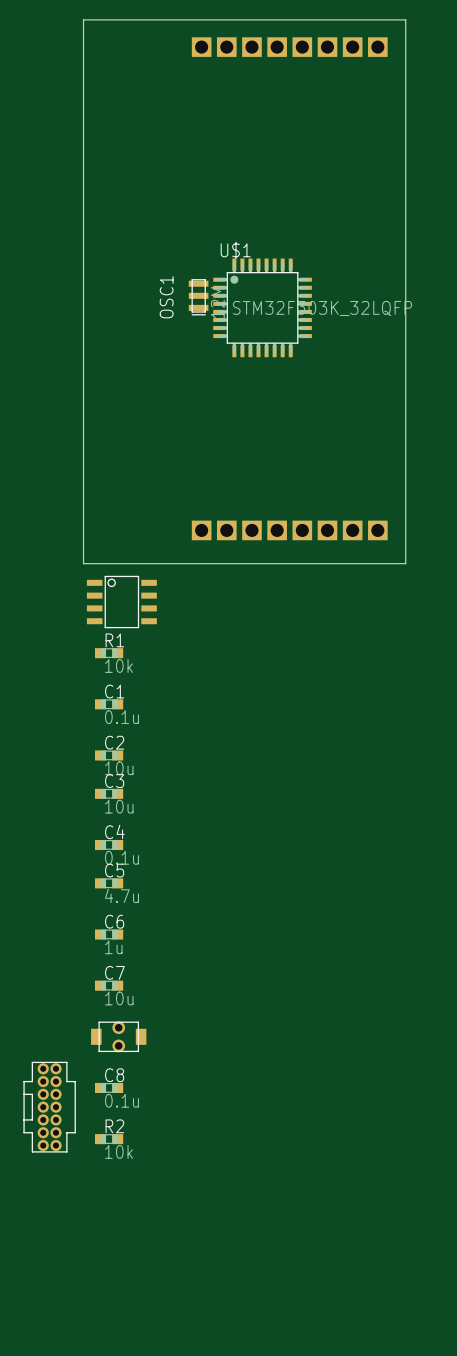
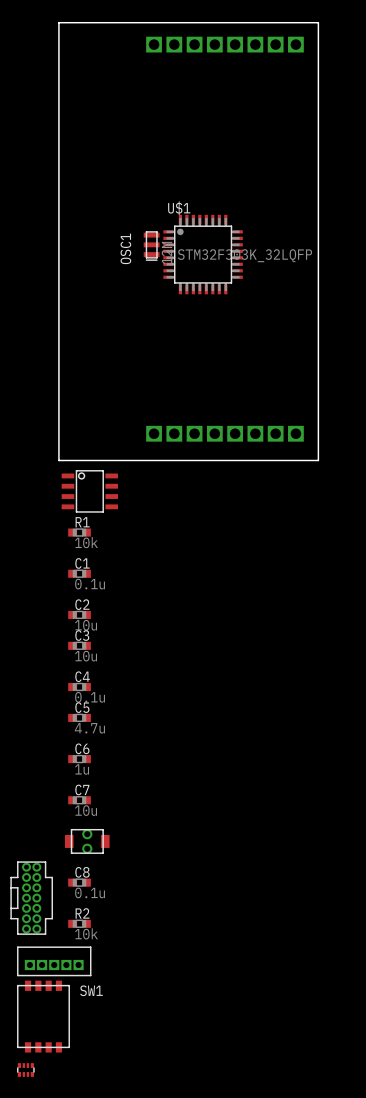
part: none -> (54, 961)
SW1: none -> (43, 1016)
part: none -> (25, 1070)

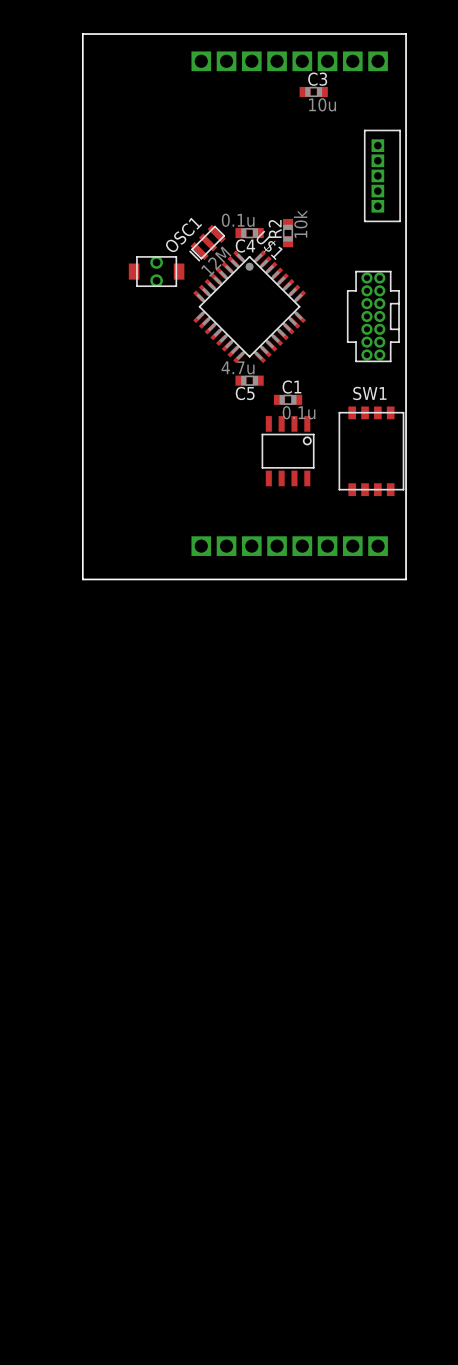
part: none -> (382, 175)
part: none -> (156, 271)
OSC1 rotation: 0° (151, 246) -> 45° clockwise (207, 243)
OSC1 position: (151, 246) -> (207, 243)
part: none -> (373, 316)
U$1 rotation: 0° (203, 254) -> 45° clockwise (249, 306)
U$1 value: STM32F303K_32LQFP (244, 255) -> none
part rotation: 0° (89, 491) -> 90° clockwise (288, 451)
part position: (89, 491) -> (288, 451)
R1: 10k (79, 532) -> none
C1 position: (79, 573) -> (288, 399)
C2: 10u (79, 614) -> none
C3 position: (79, 645) -> (313, 91)
C4 name position: C4 (82, 676) -> C4 (245, 245)
C4 position: (79, 687) -> (249, 233)
C4 value position: 0.1u (90, 697) -> 0.1u (238, 220)
C5 name position: C5 (82, 707) -> C5 (245, 393)
C5 position: (79, 717) -> (249, 380)
C5 value position: 4.7u (89, 728) -> 4.7u (238, 367)
C6: 1u (79, 759) -> none
C7: 10u (79, 800) -> none
part: (87, 841) -> none
C8: 0.1u (79, 882) -> none
part: (31, 898) -> none
R2 name position: R2 (82, 913) -> R2 (275, 228)
R2 rotation: 0° (79, 923) -> 90° clockwise (288, 233)
R2 position: (79, 923) -> (288, 233)
R2 value position: 10k (86, 933) -> 10k (300, 224)
part: (54, 961) -> none
SW1 name position: SW1 (91, 990) -> SW1 (369, 393)
SW1 position: (43, 1016) -> (371, 451)
part: (25, 1070) -> none

